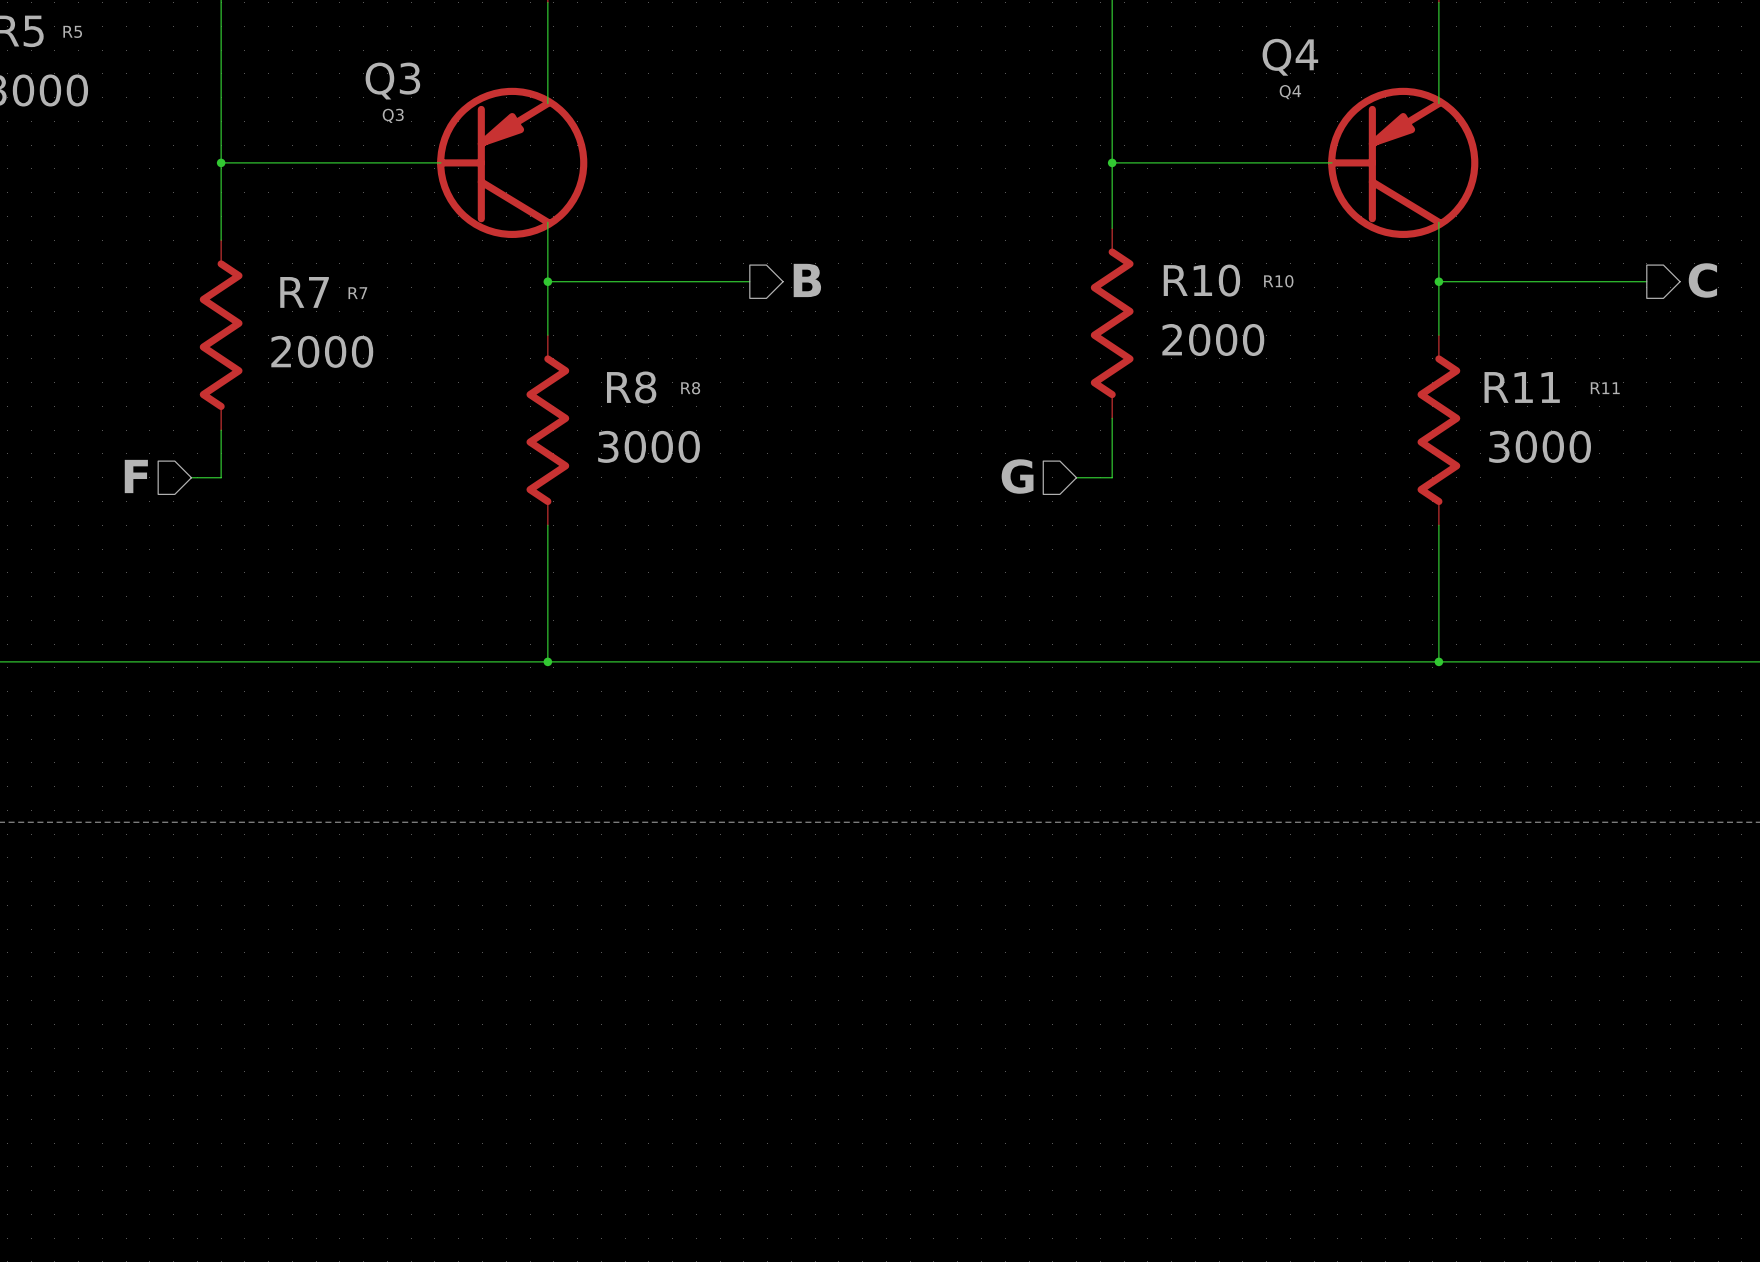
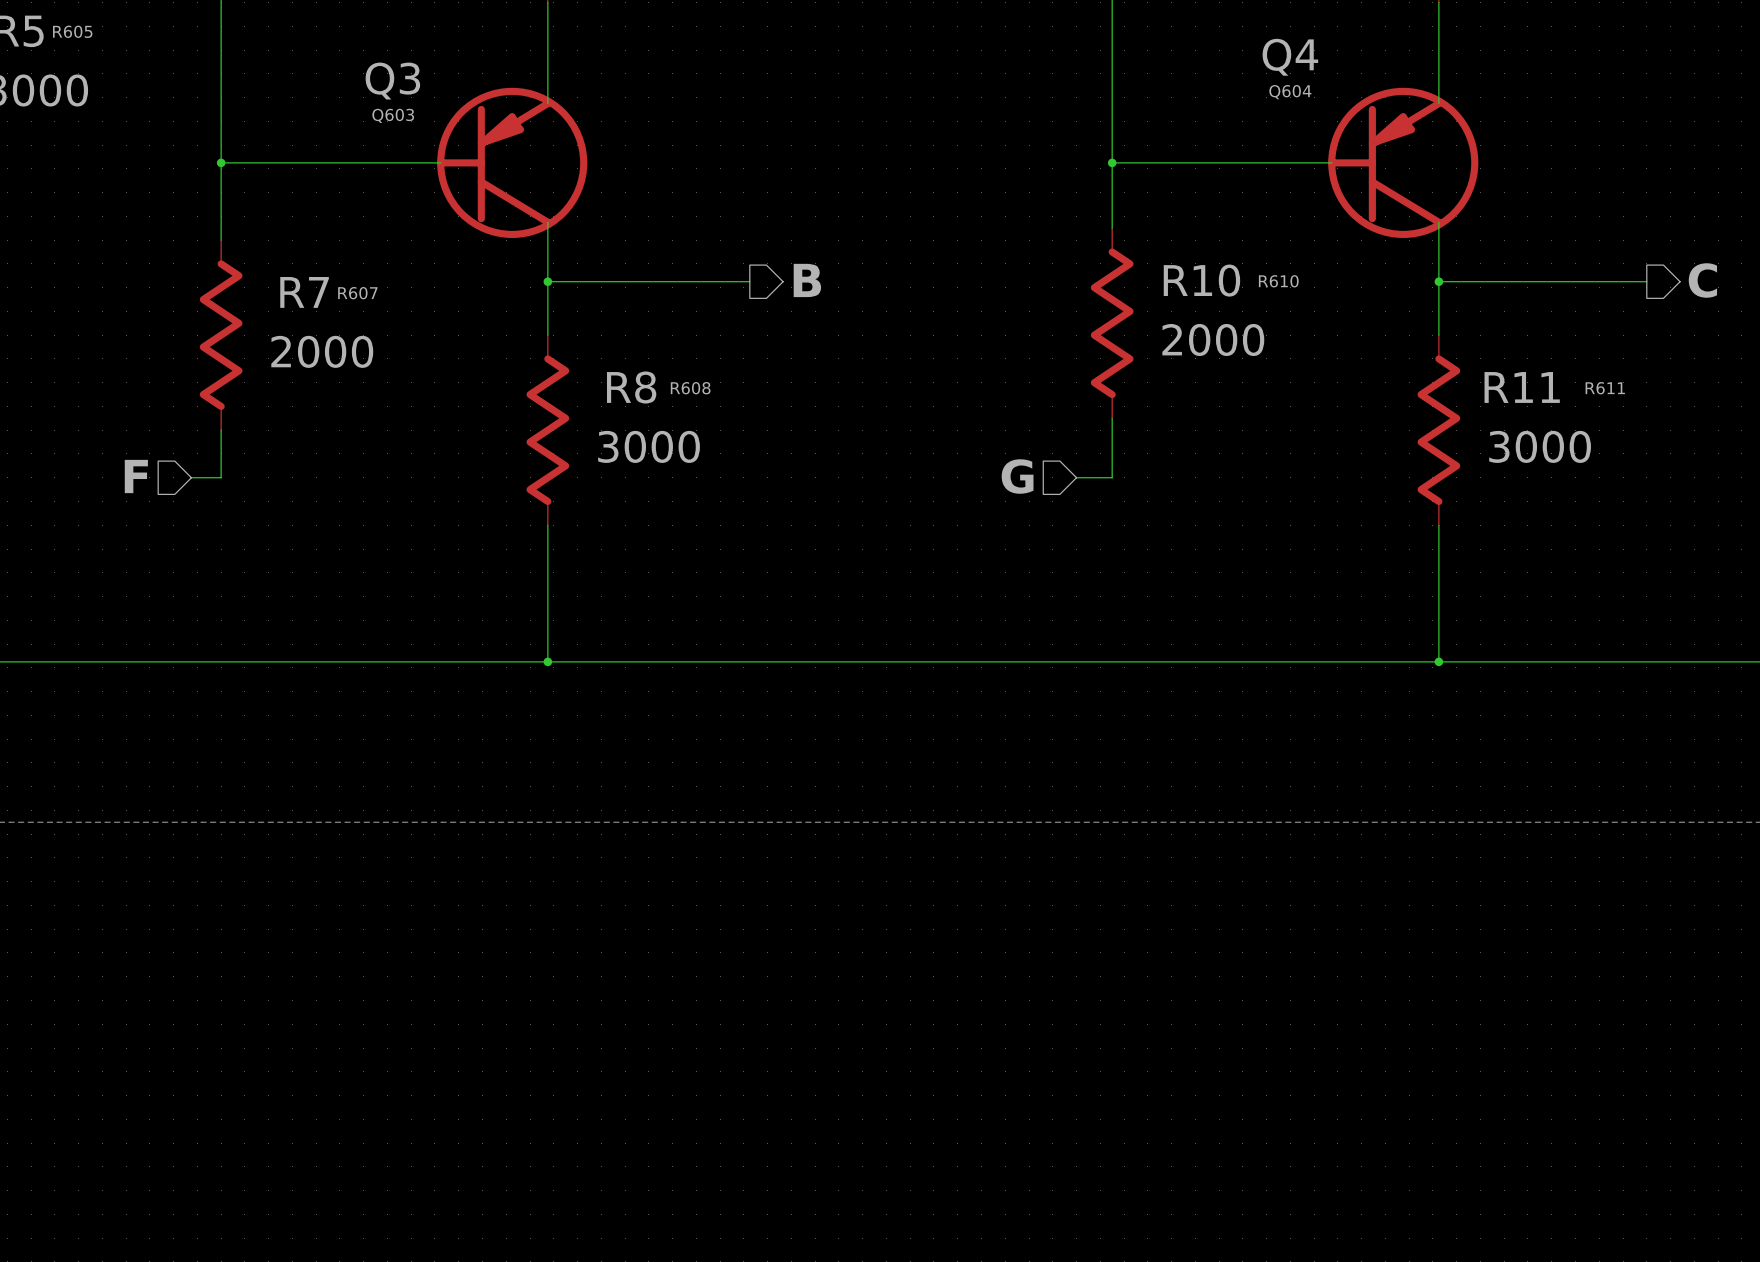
R5 name: R5 (72, 31) -> R605 (72, 31)
Q4 name: Q4 (1290, 92) -> Q604 (1290, 92)
Q3 name: Q3 (393, 115) -> Q603 (393, 115)
R10 name: R10 (1278, 281) -> R610 (1278, 281)
R7 name: R7 (357, 293) -> R607 (357, 293)
R8 name: R8 (690, 388) -> R608 (690, 388)
R11 name: R11 (1605, 388) -> R611 (1605, 388)

